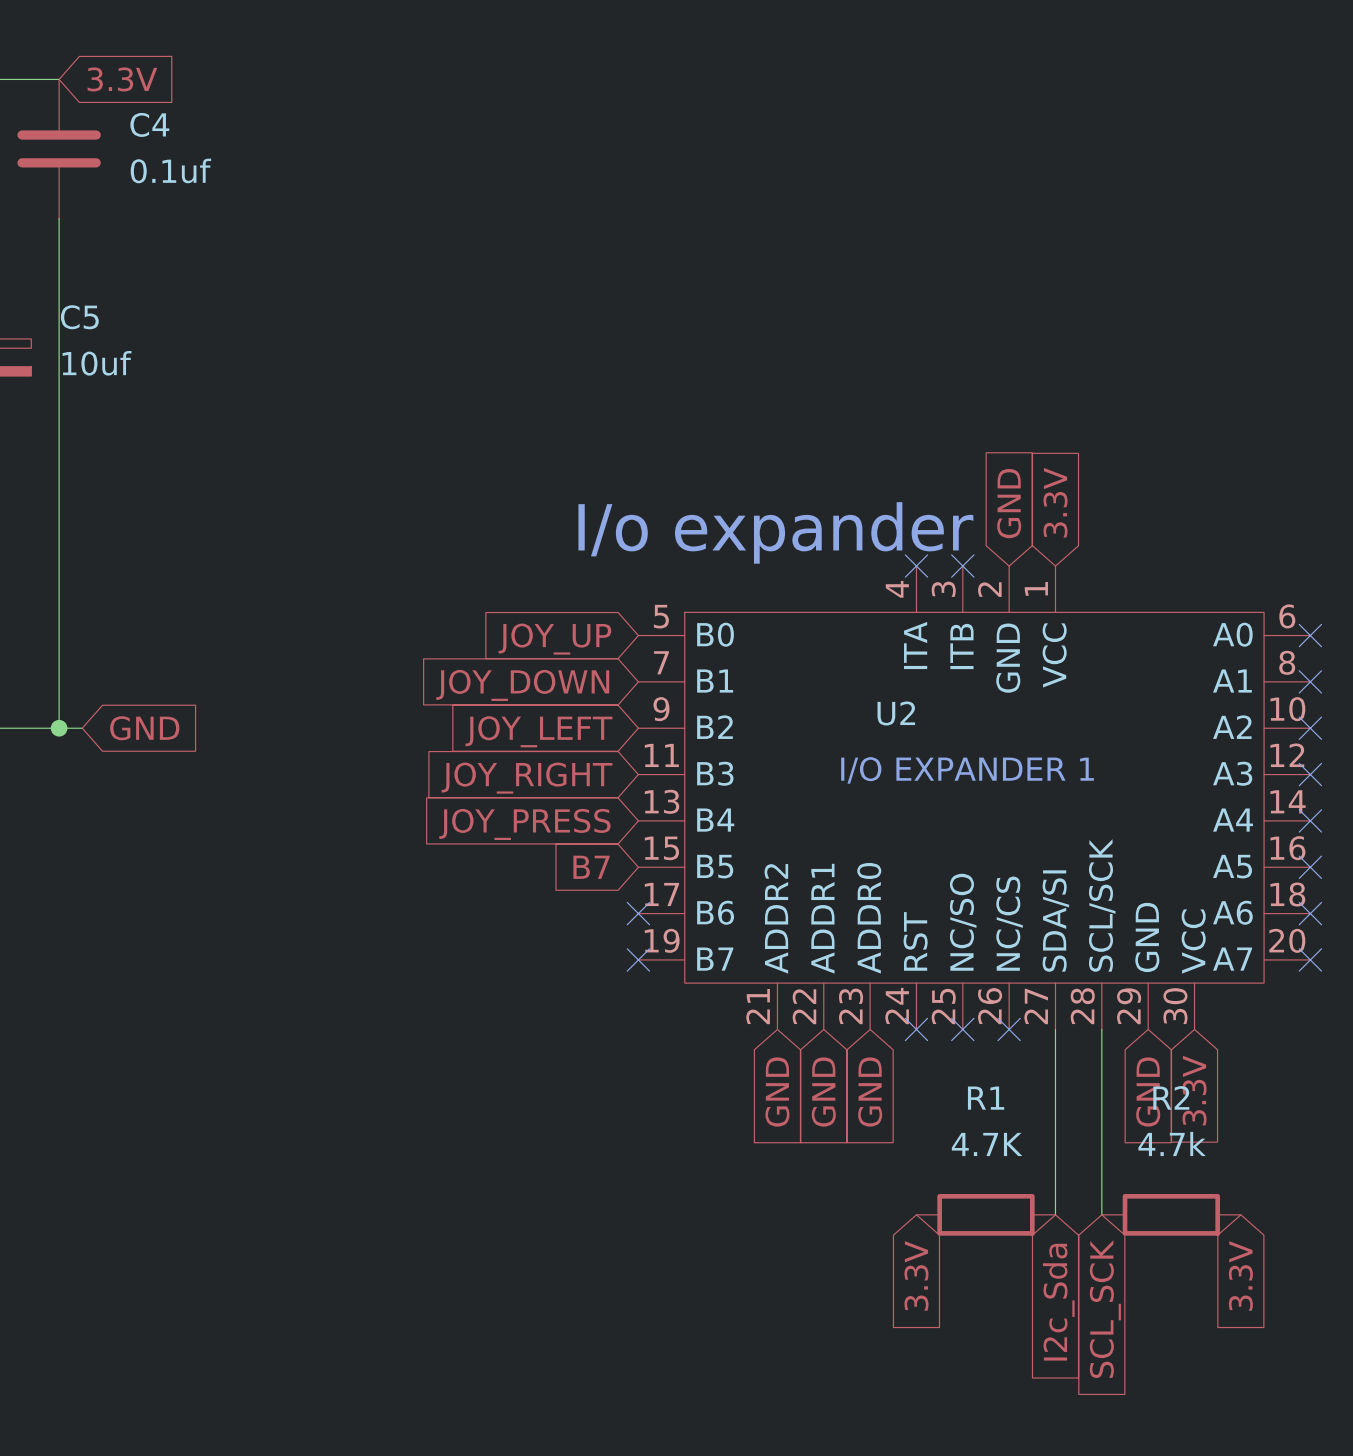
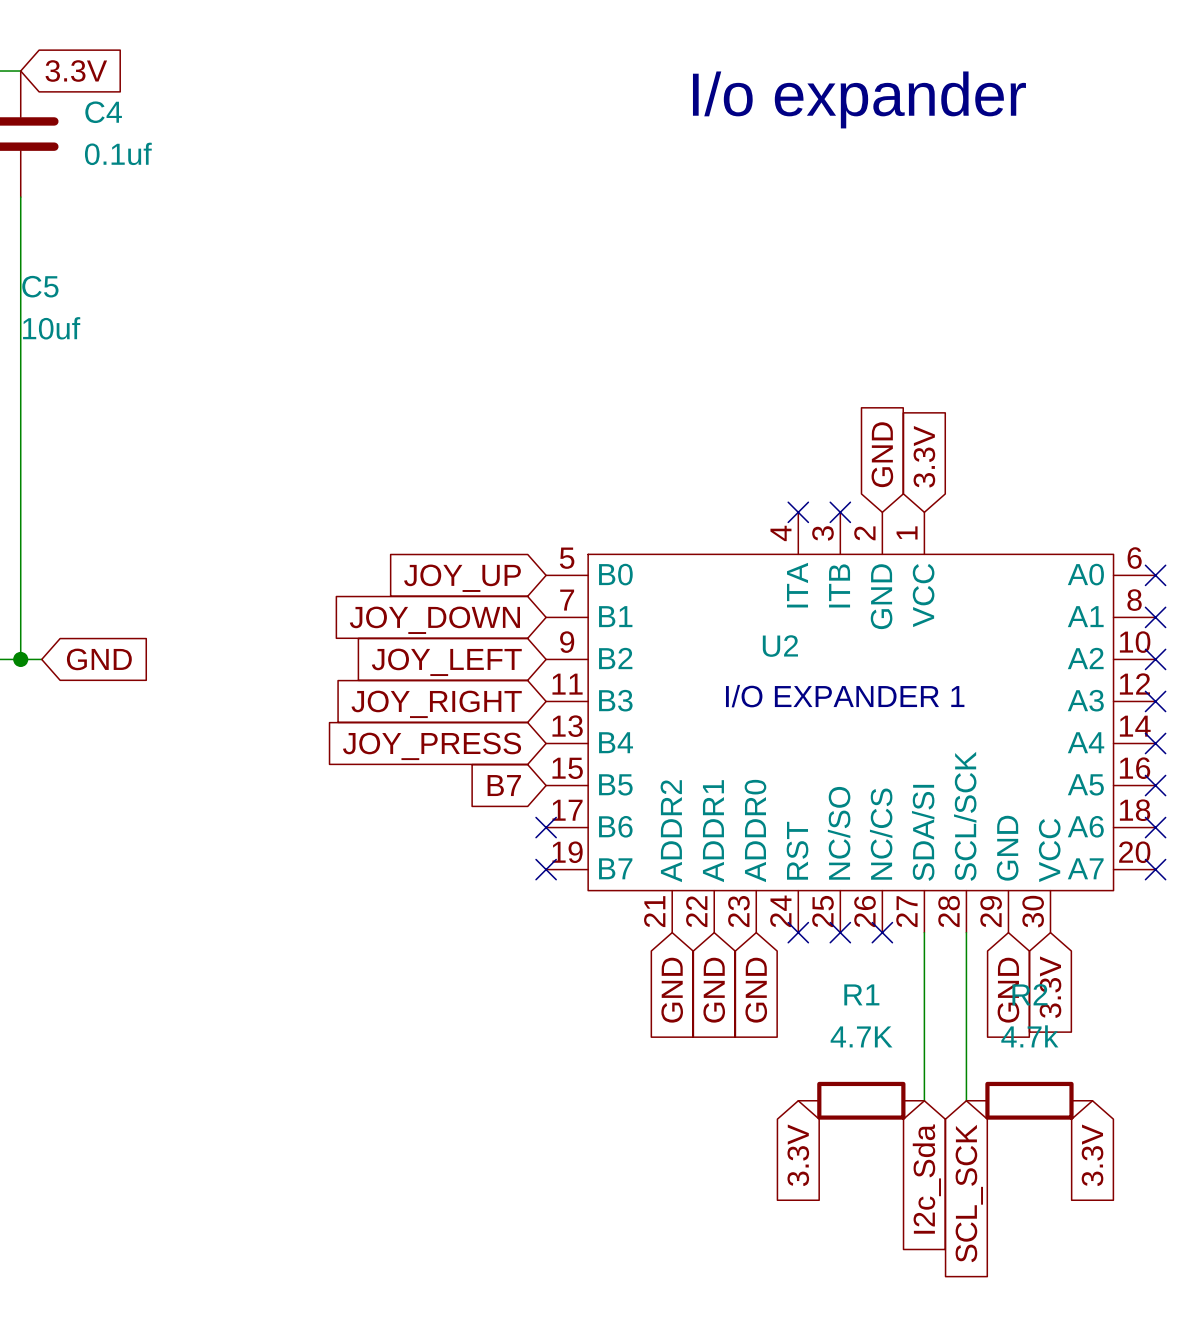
text: none -> I/o expander (859, 99)
text: I/o expander (775, 532) -> none

